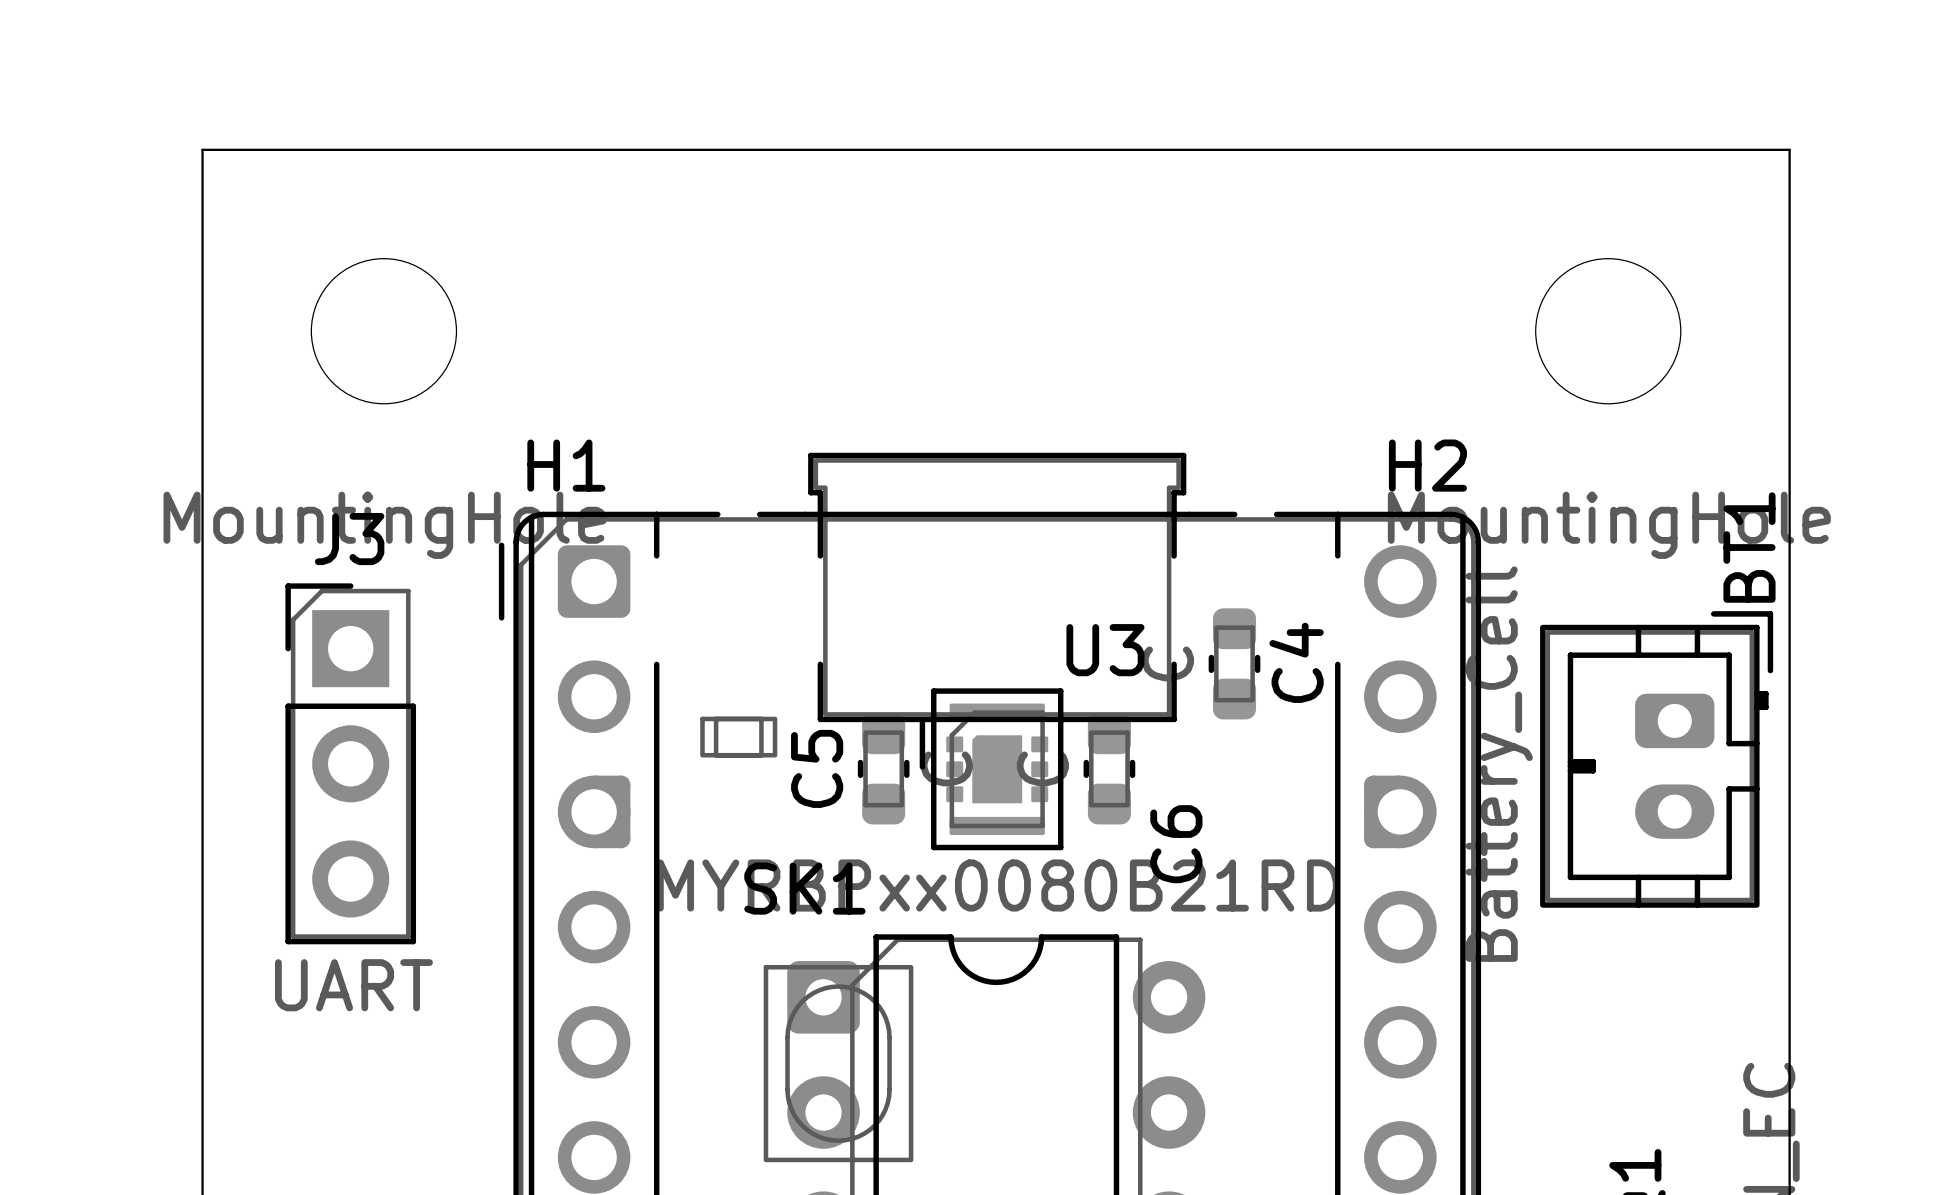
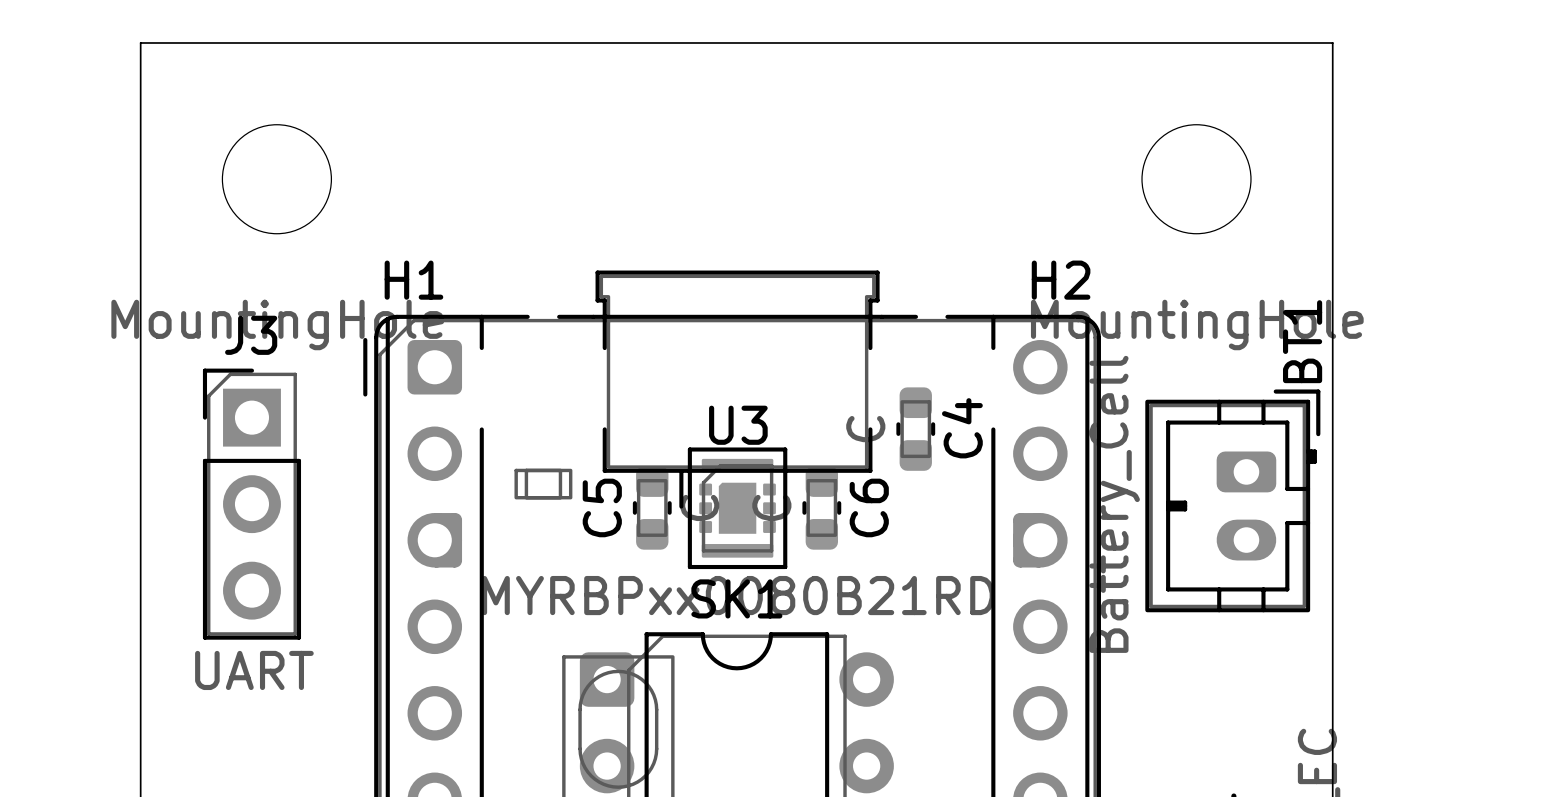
U3 name position: U3 (1105, 650) -> U3 (738, 425)
C6 name position: C6 (1176, 844) -> C6 (869, 507)
SK1 name position: SK1 (804, 888) -> SK1 (736, 598)

